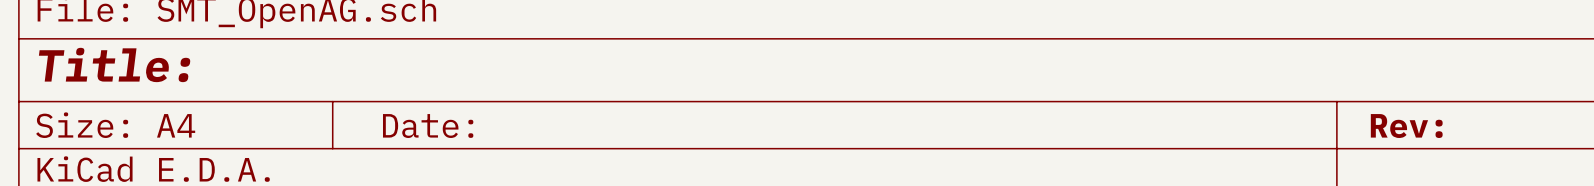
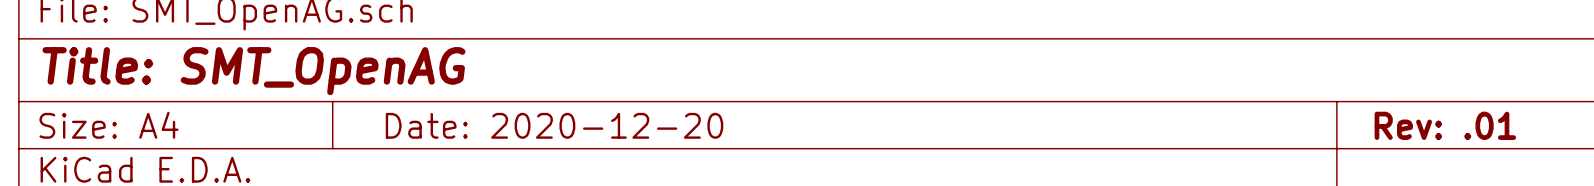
title block: Title: (114, 64) -> Title: SMT_OpenAG (254, 71)
title block: Date: (428, 126) -> Date: 2020-12-20 (554, 125)
title block: Rev: (1406, 126) -> Rev: .01 (1445, 125)

